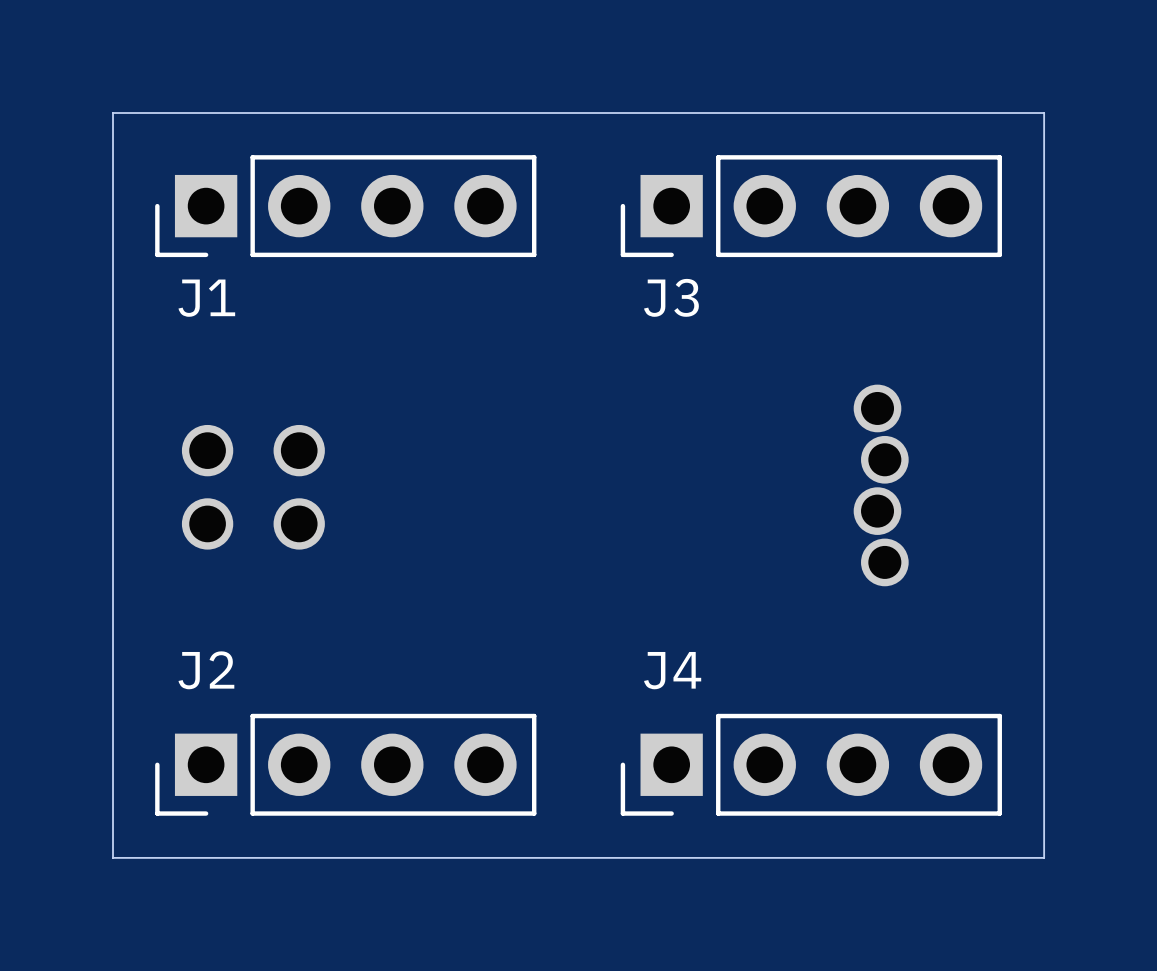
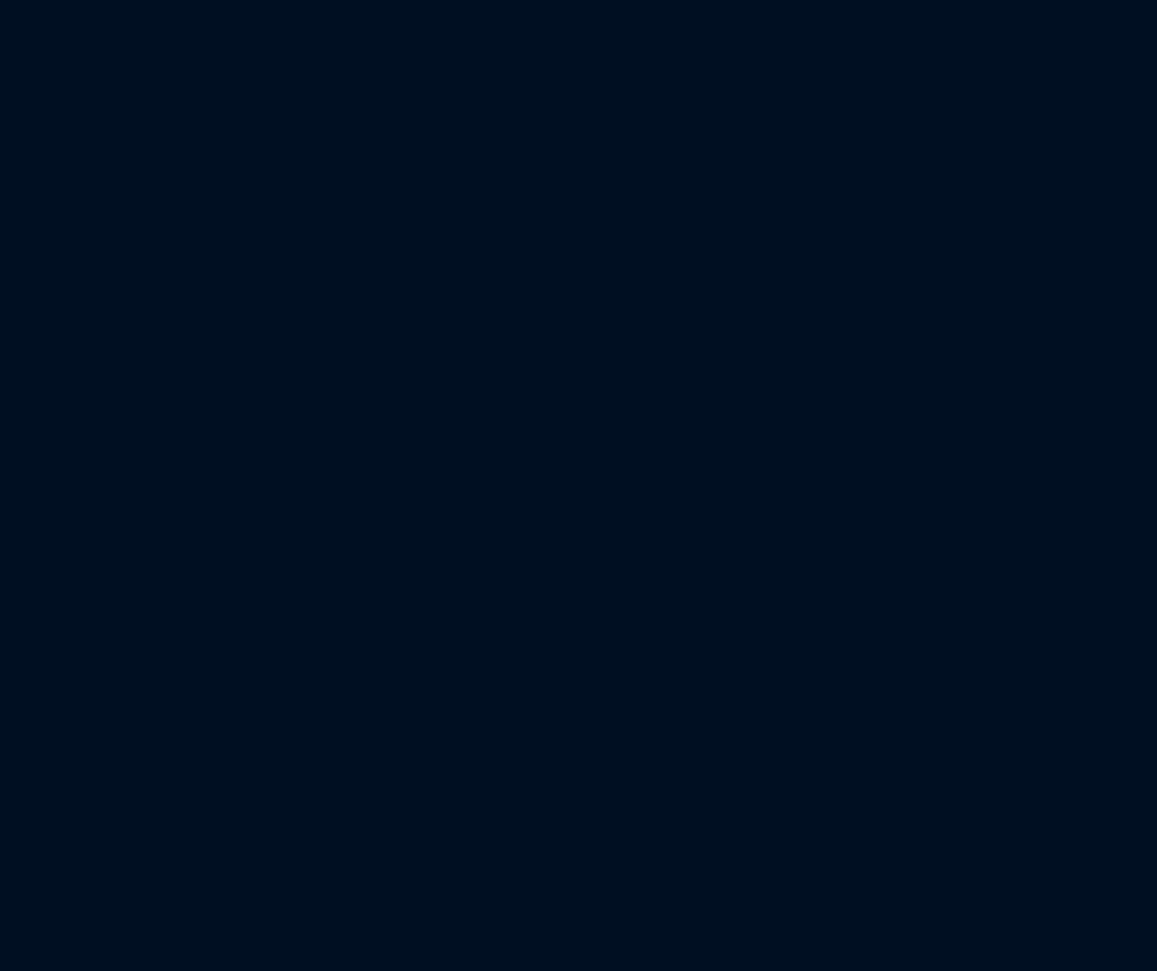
board edge: (1044, 113) (113, 113) (113, 857) (1044, 857) (1044, 113) -> none
J1: (345, 206) -> none
J3: (811, 206) -> none
part: (881, 485) -> none
part: (253, 487) -> none
J2: (345, 764) -> none
J4: (811, 764) -> none

